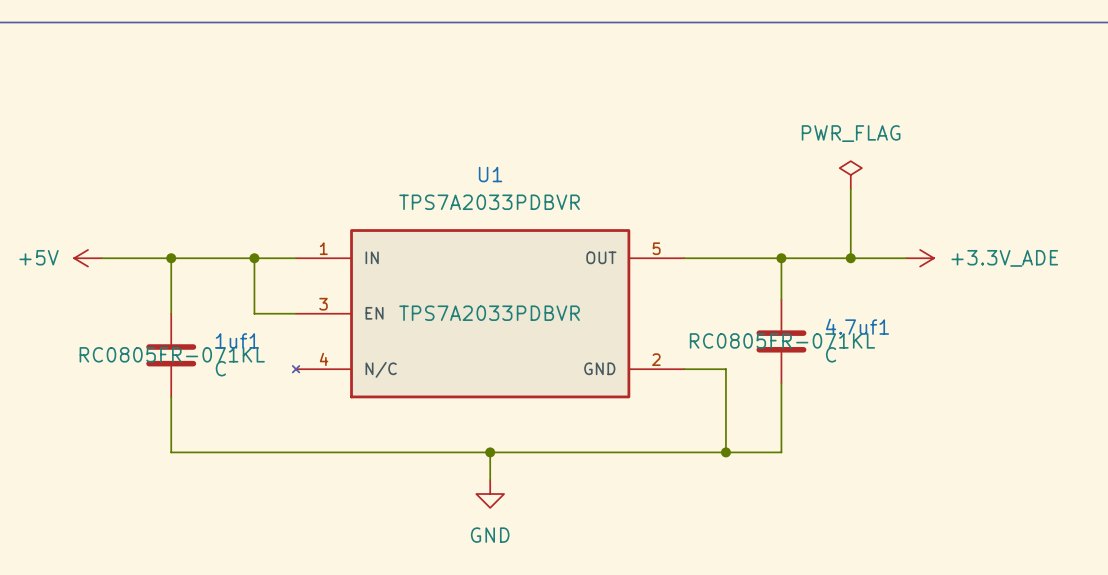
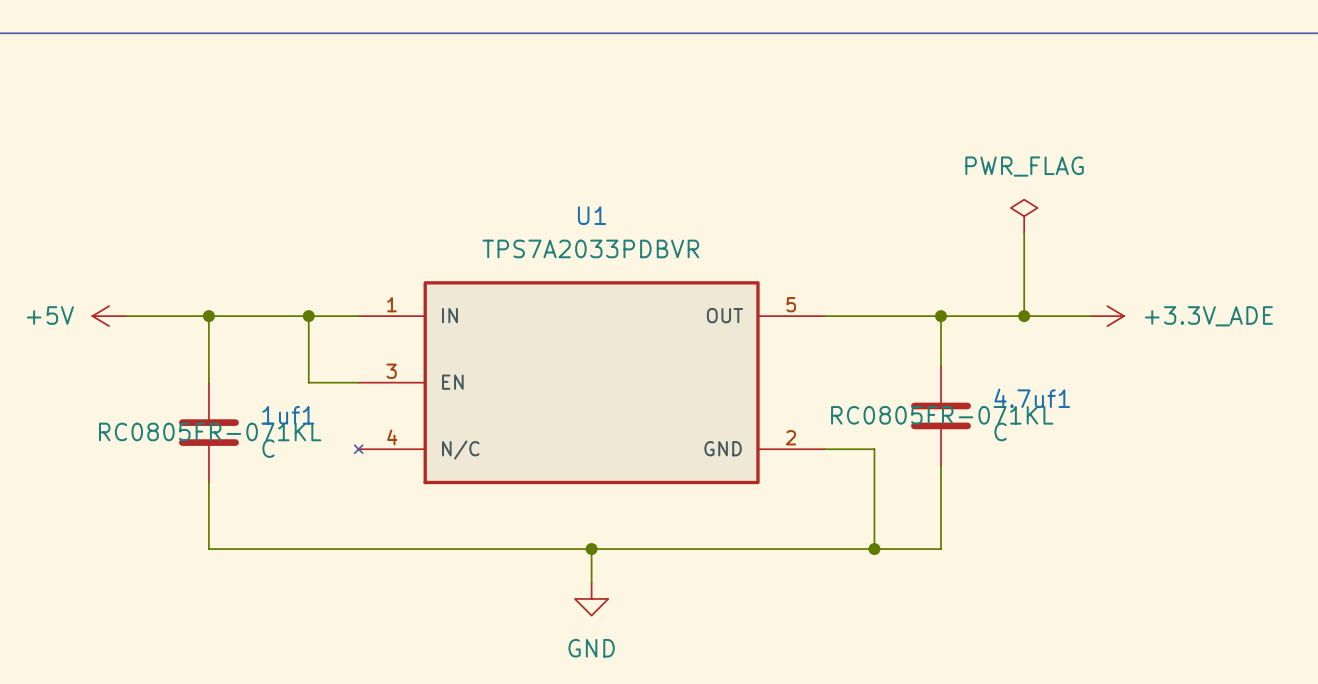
U1 text: TPS7A2033PDBVR (489, 313) -> none

